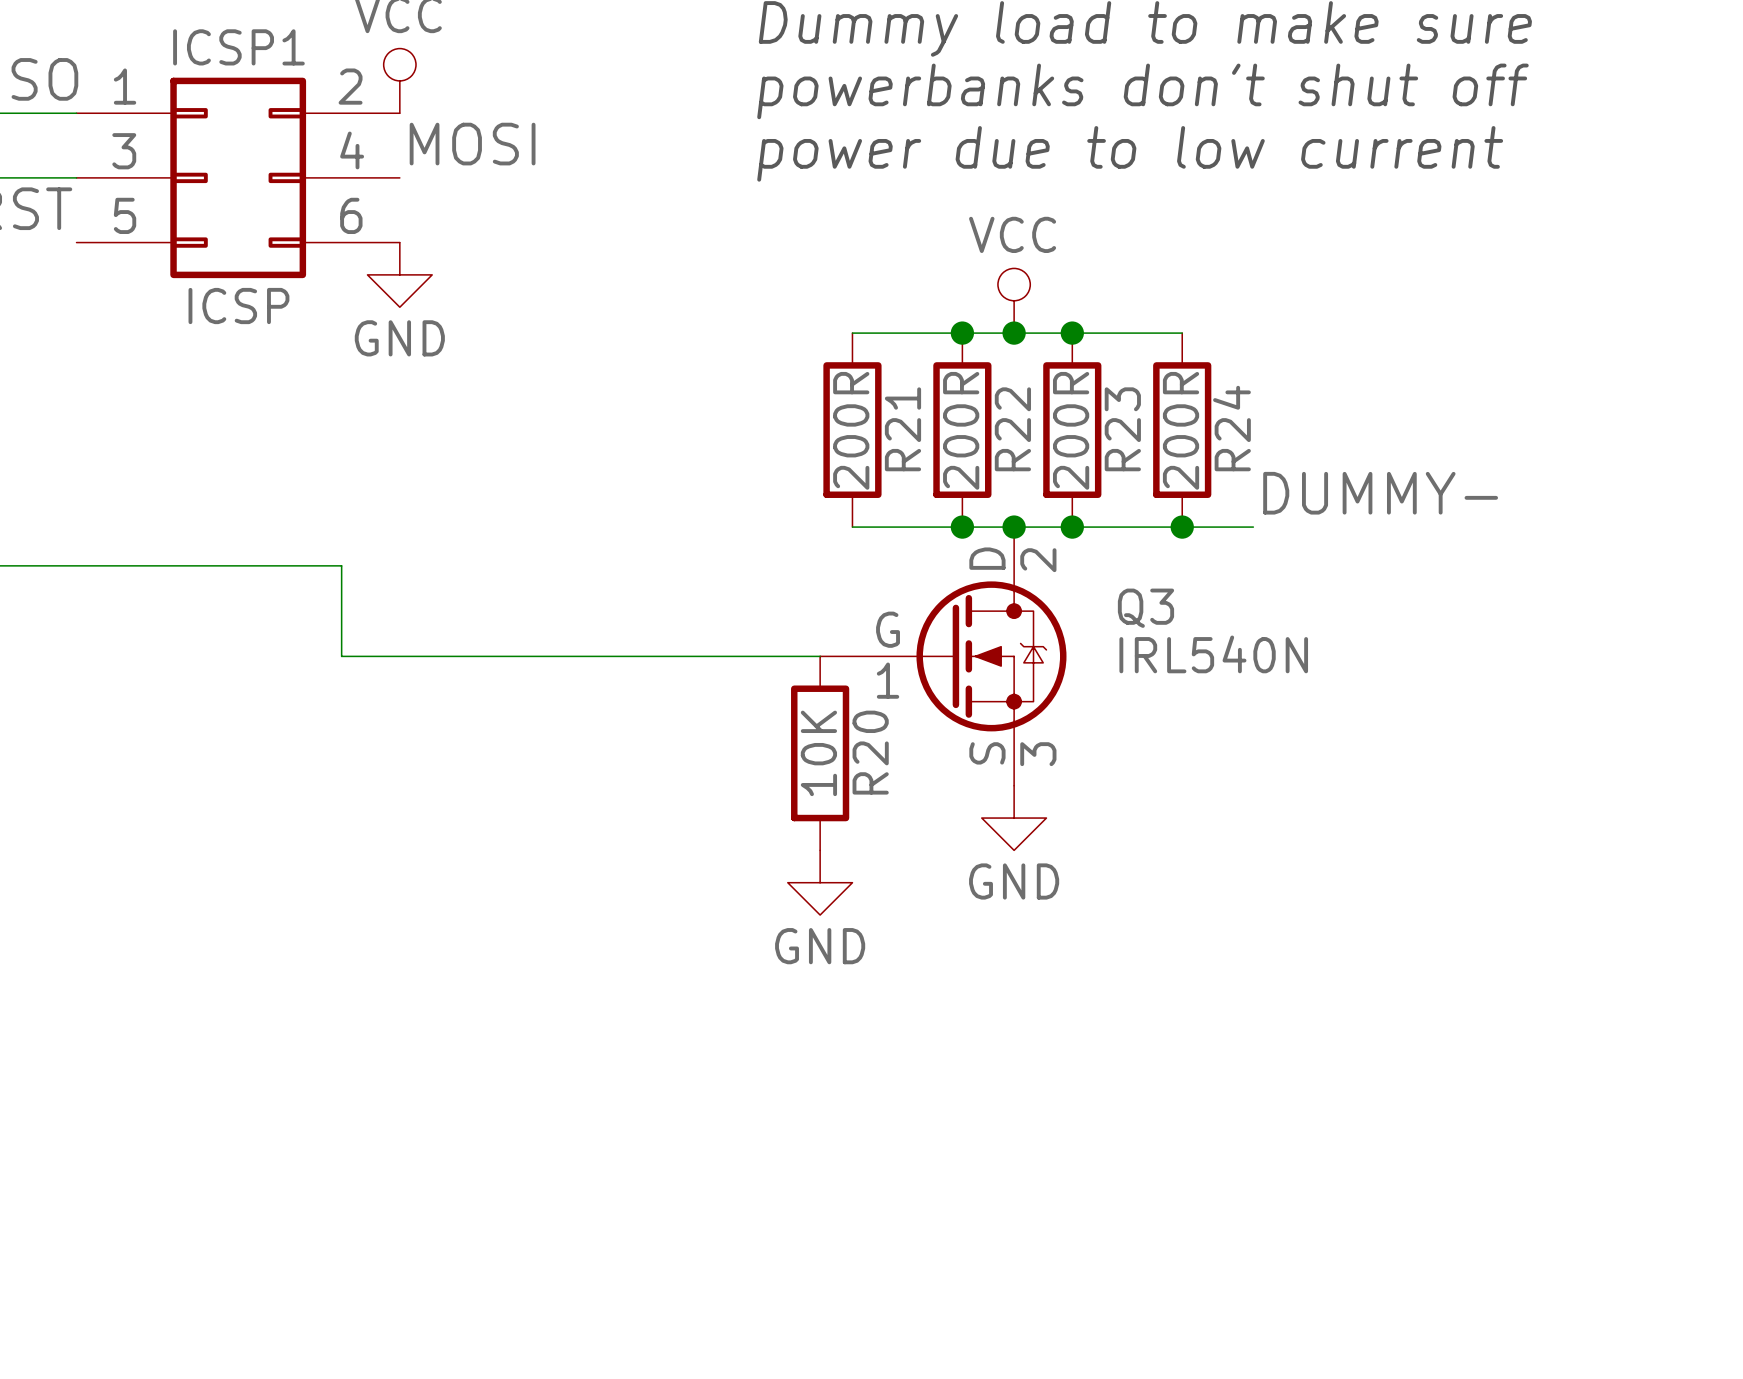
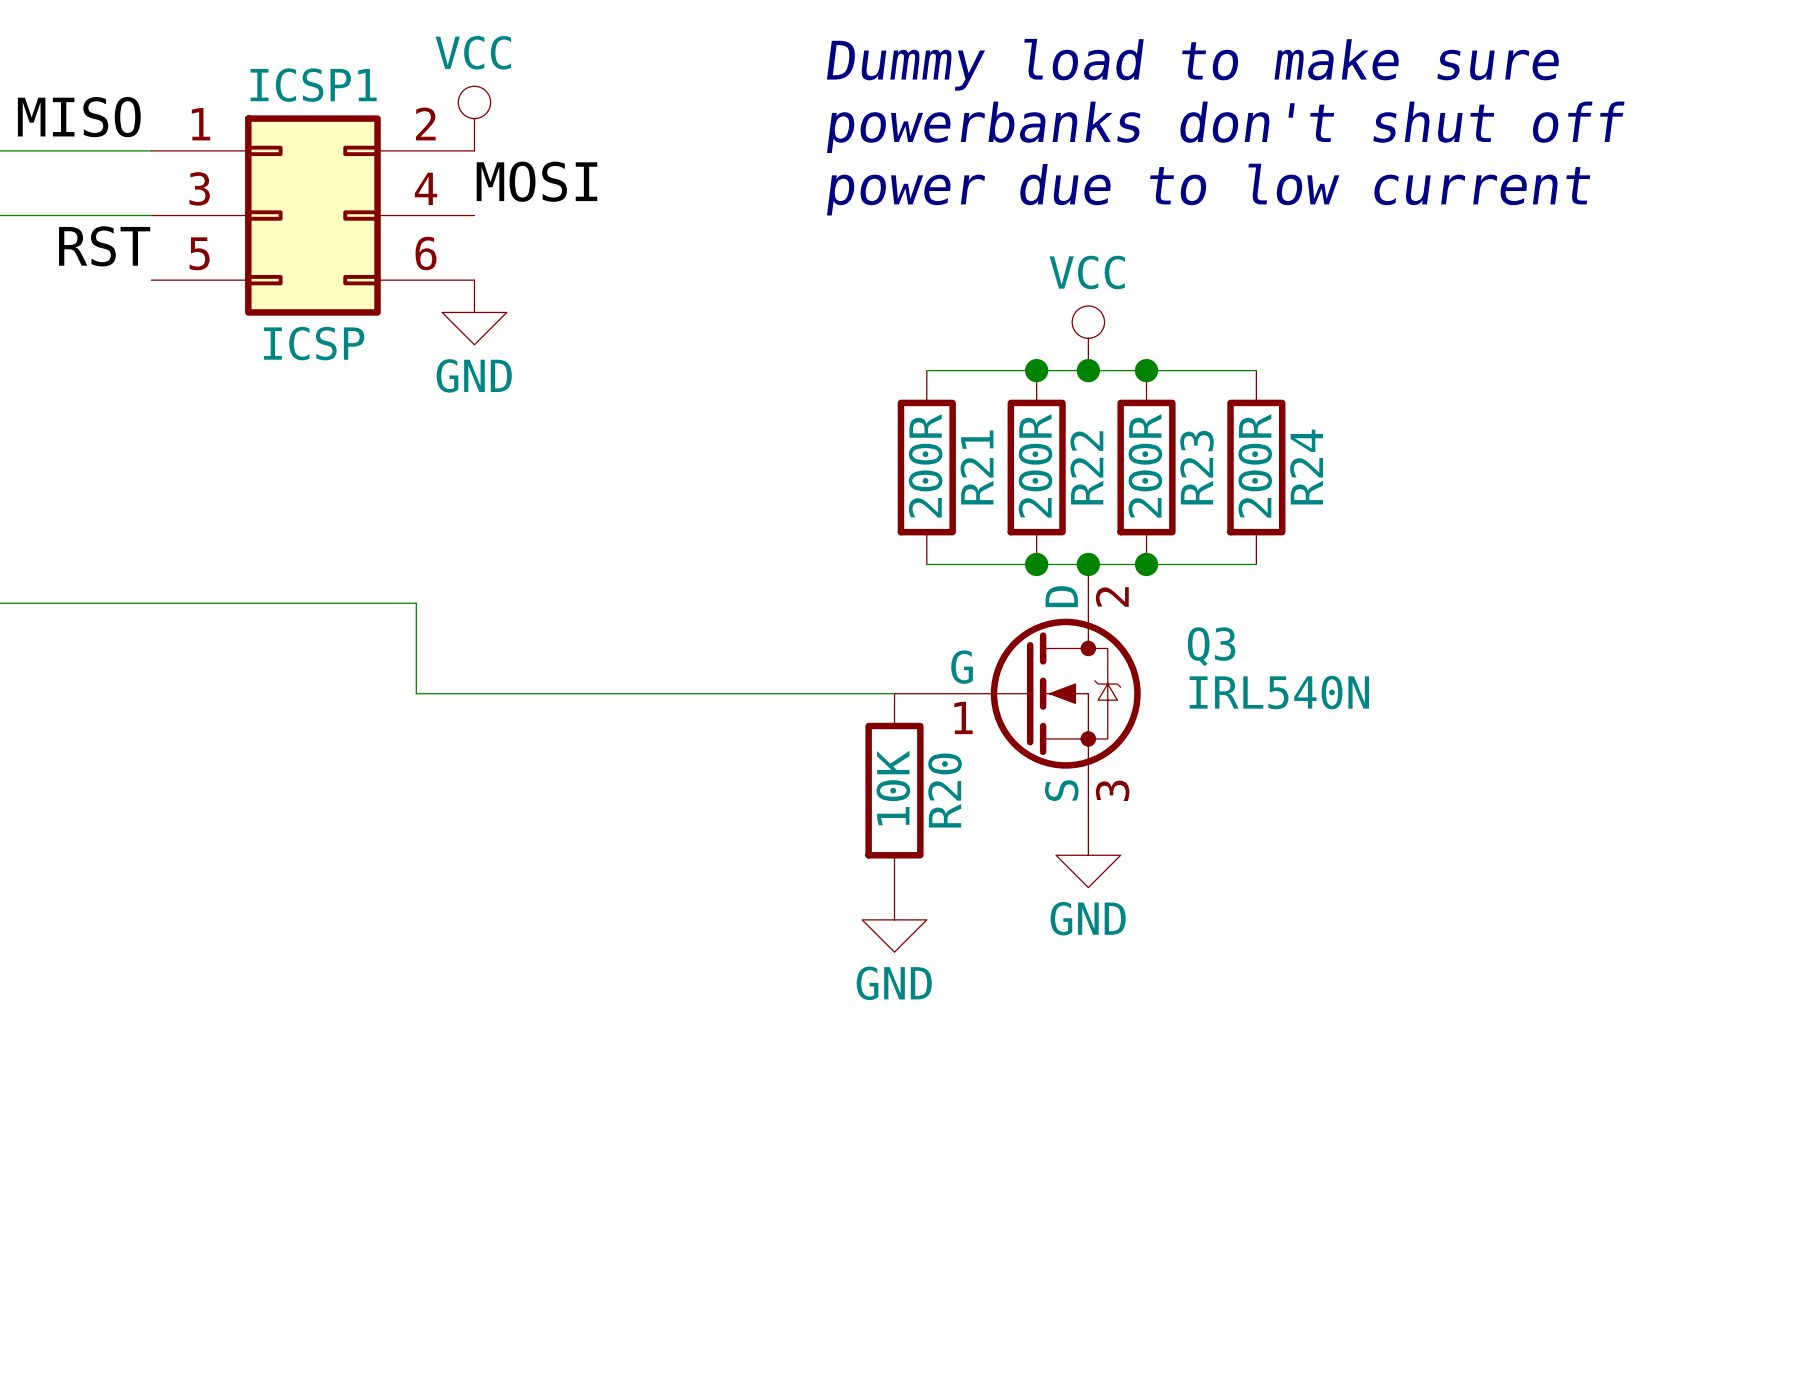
label: DUMMY- (1380, 493) -> none
wire: (1182, 527) (1253, 527) -> none
junction: (1182, 527) -> none

